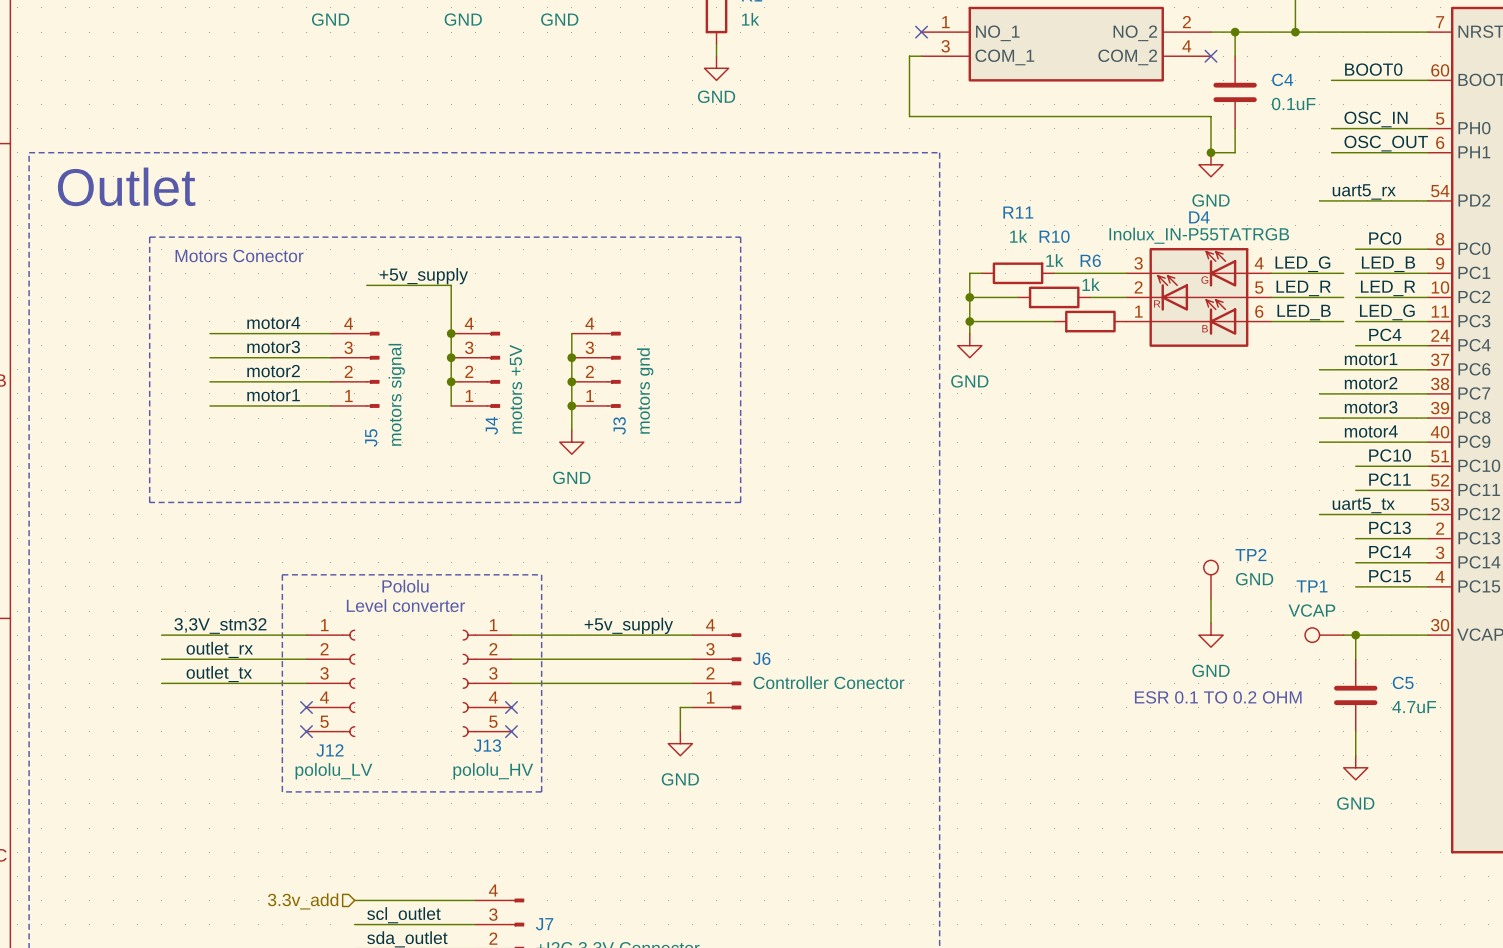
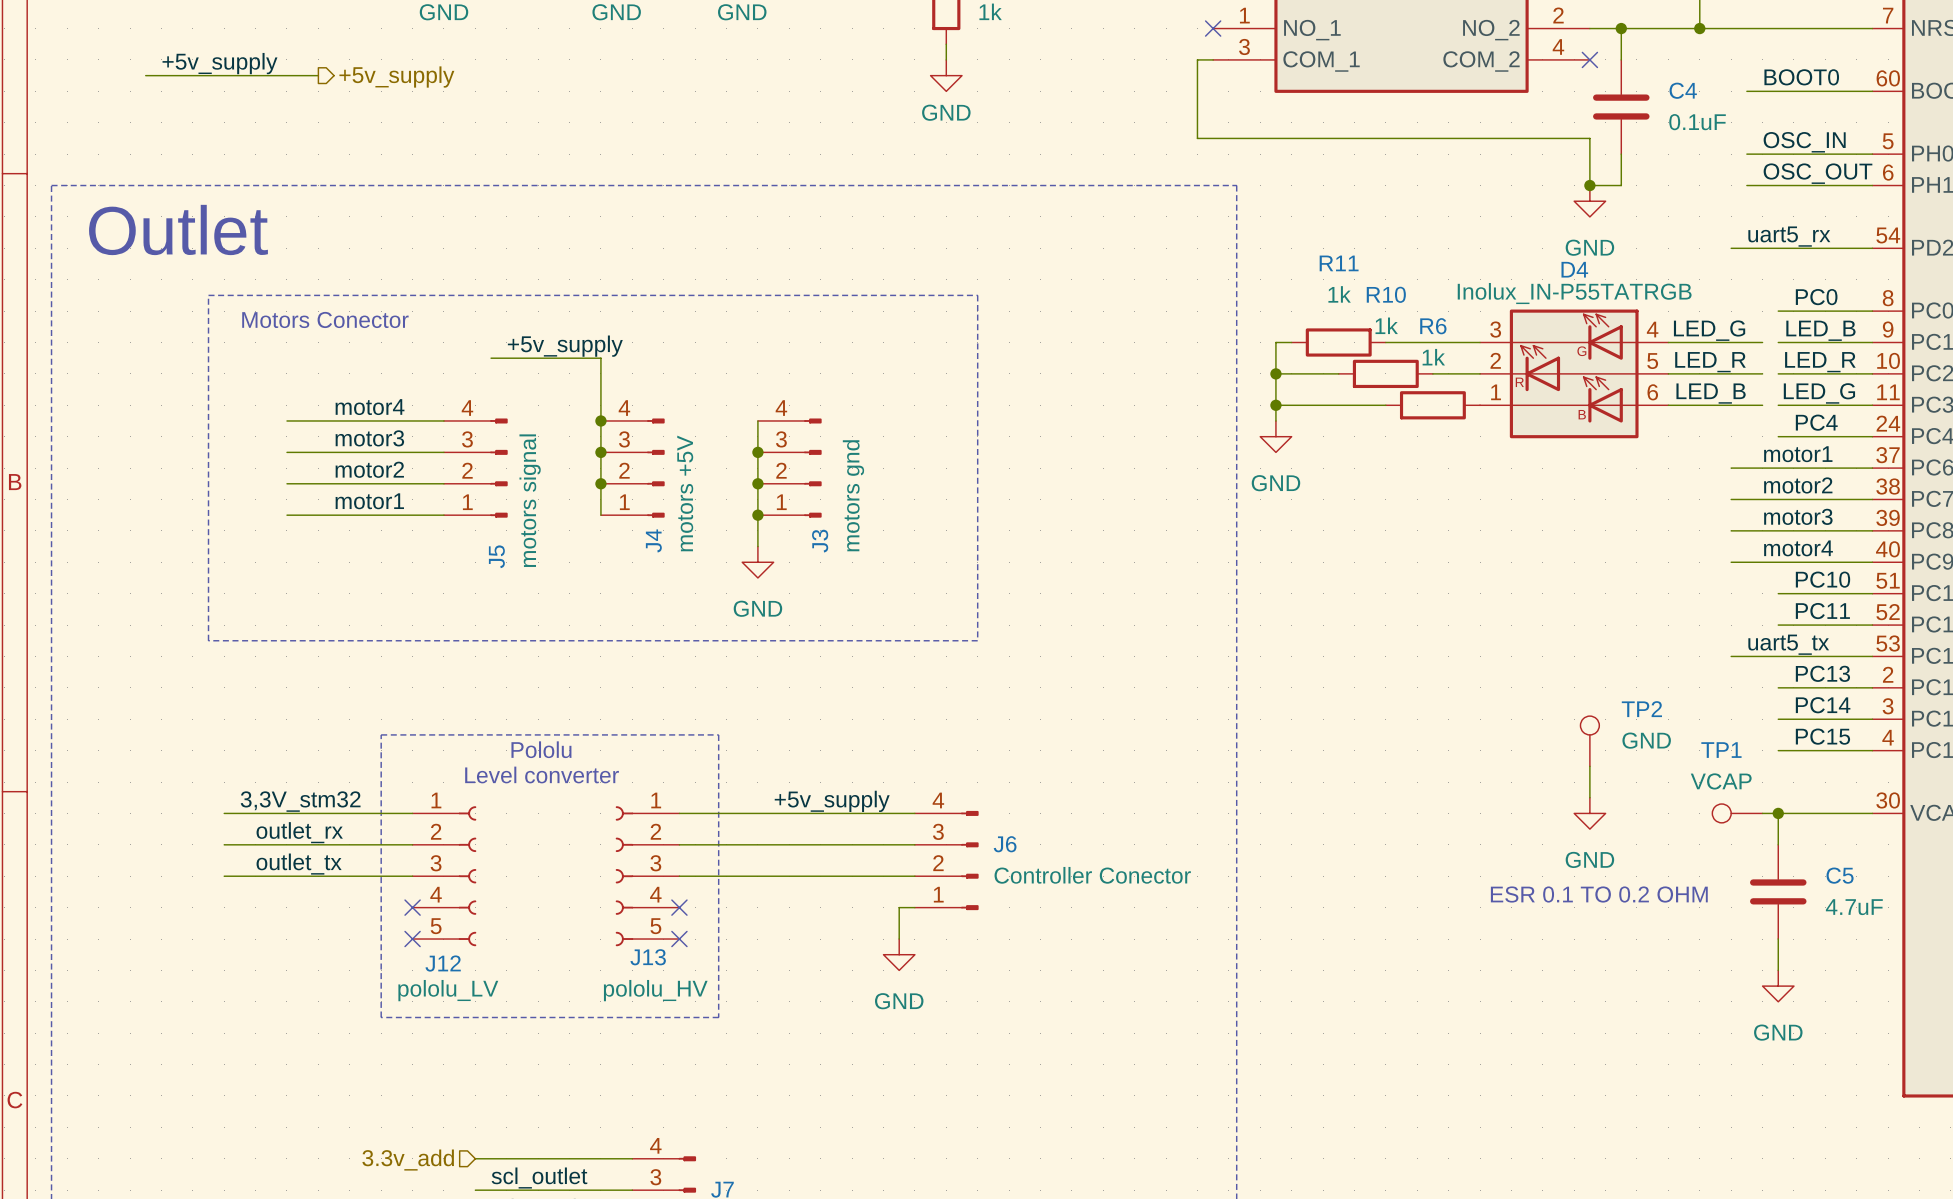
label: none -> +5v_supply (219, 63)
wire: none -> (145, 75) (318, 75)
hierarchical label: none -> +5v_supply (396, 77)

